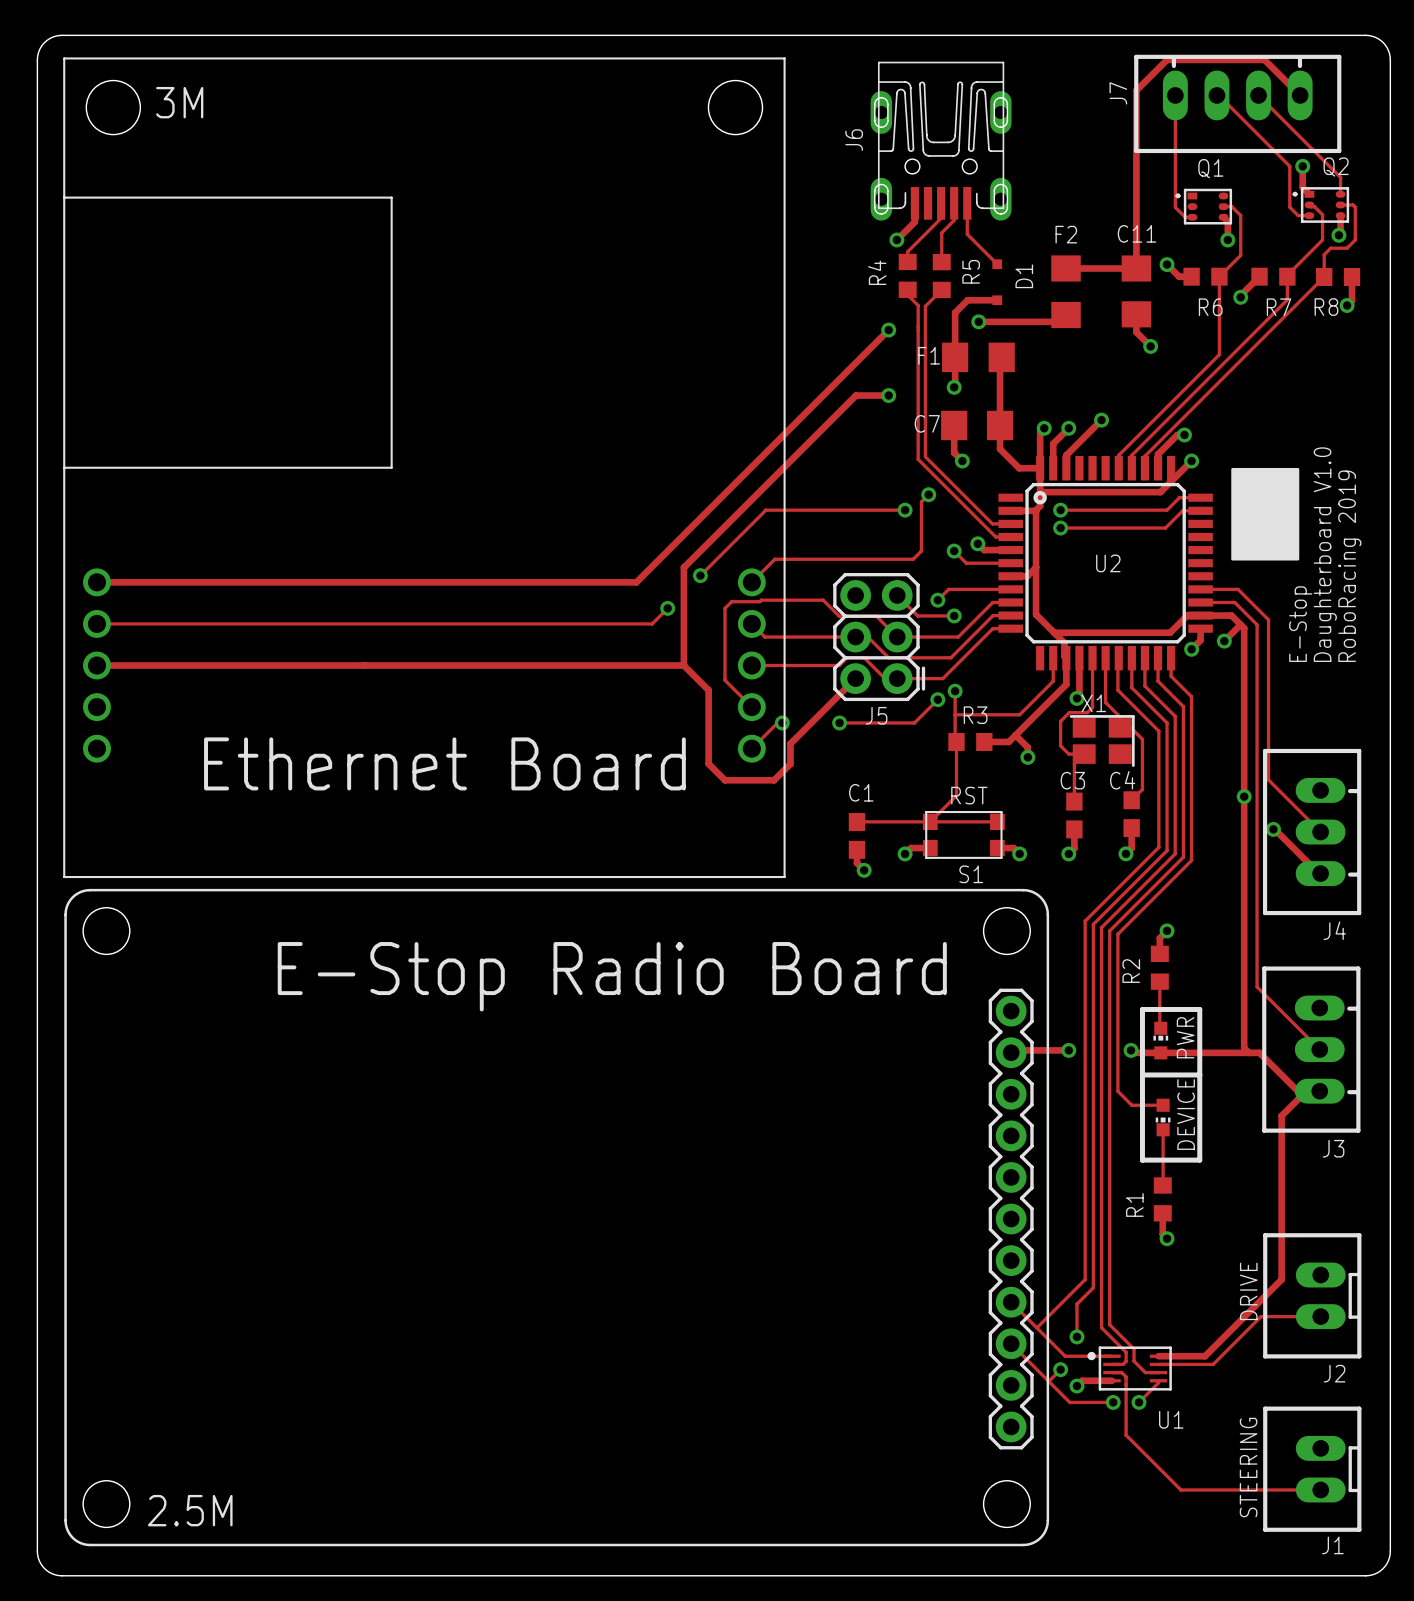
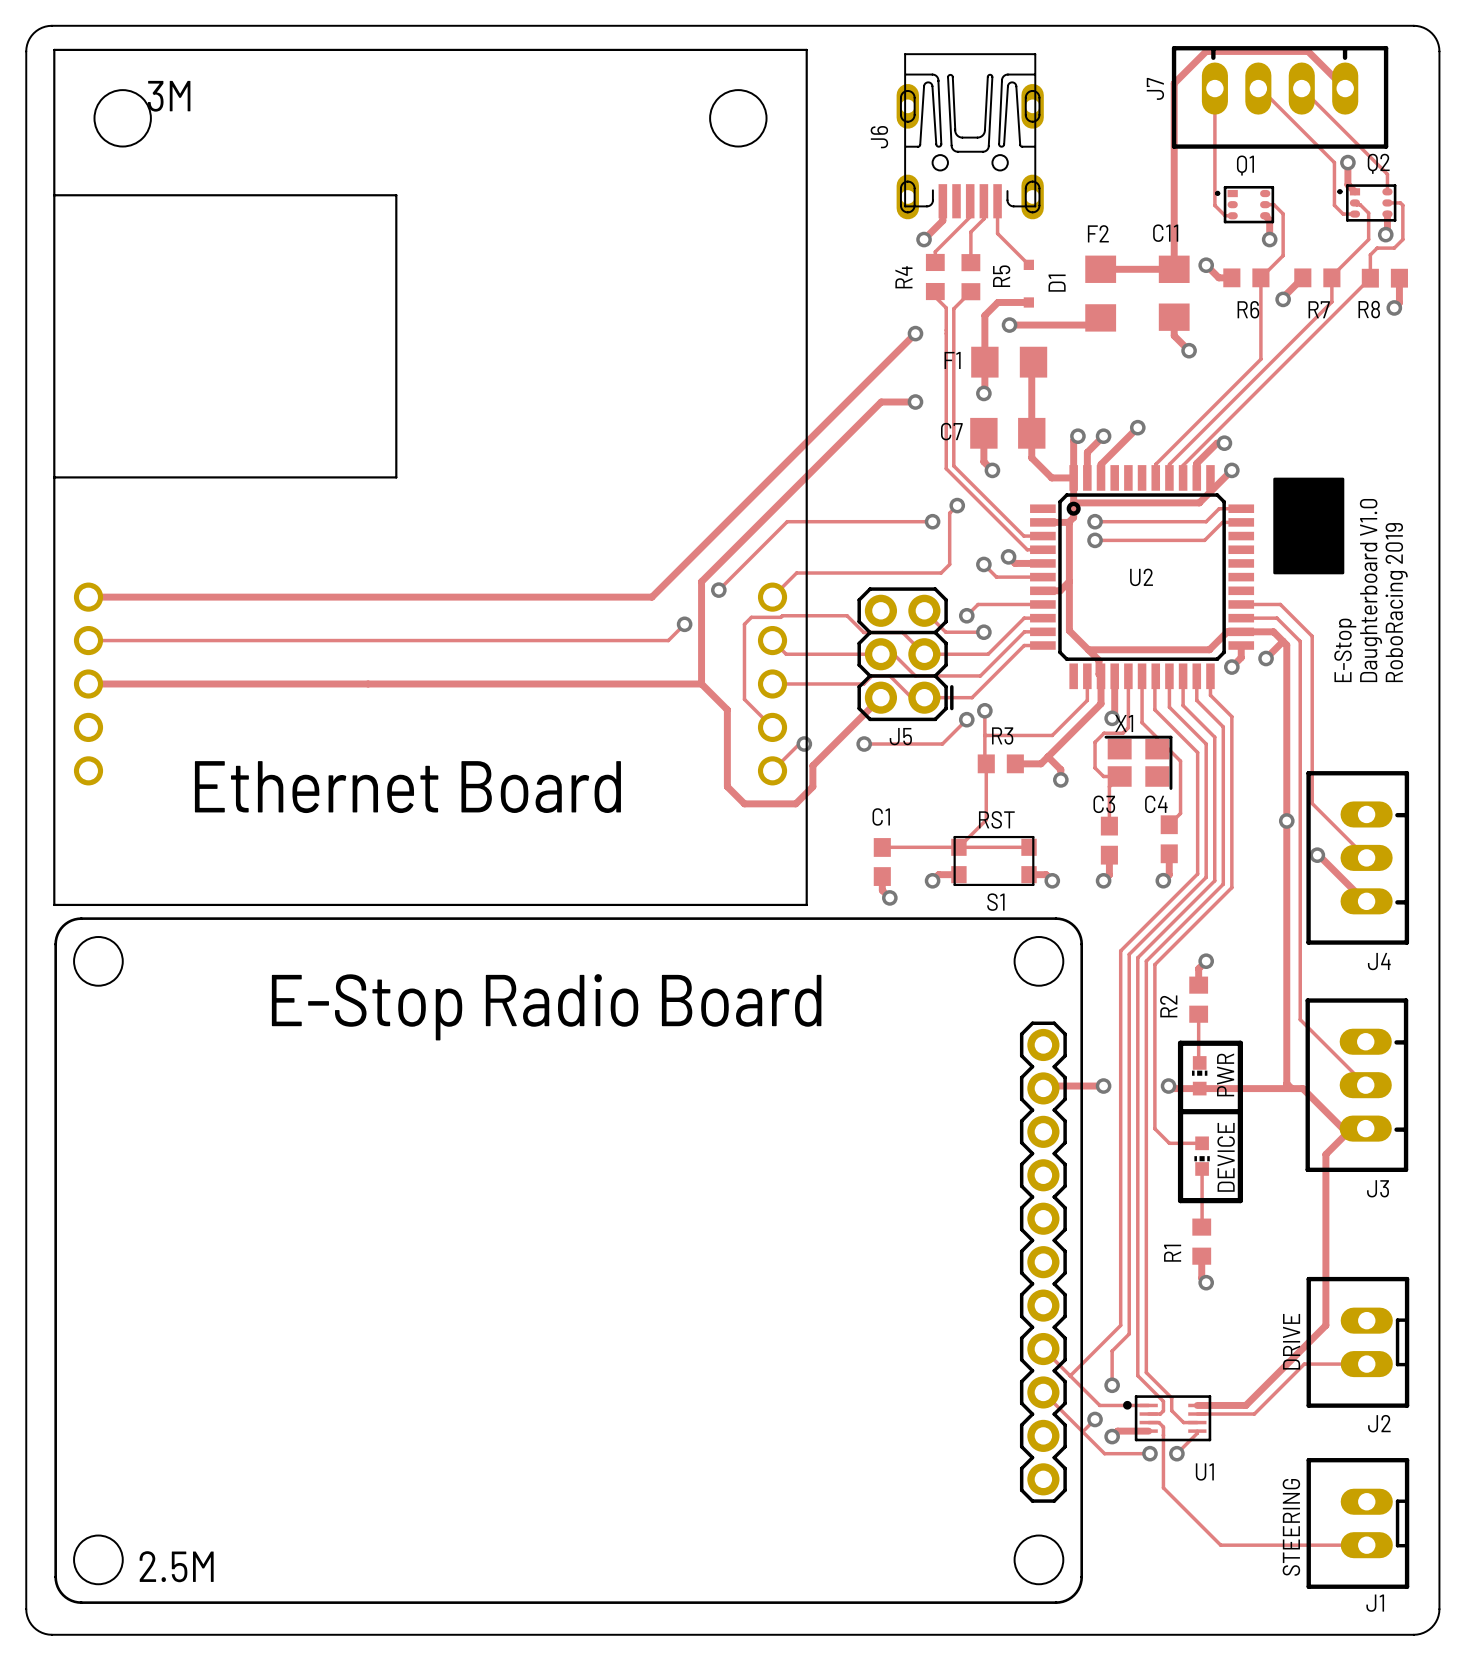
part footprint: [63, 57, 786, 879] -> [53, 48, 808, 907]

